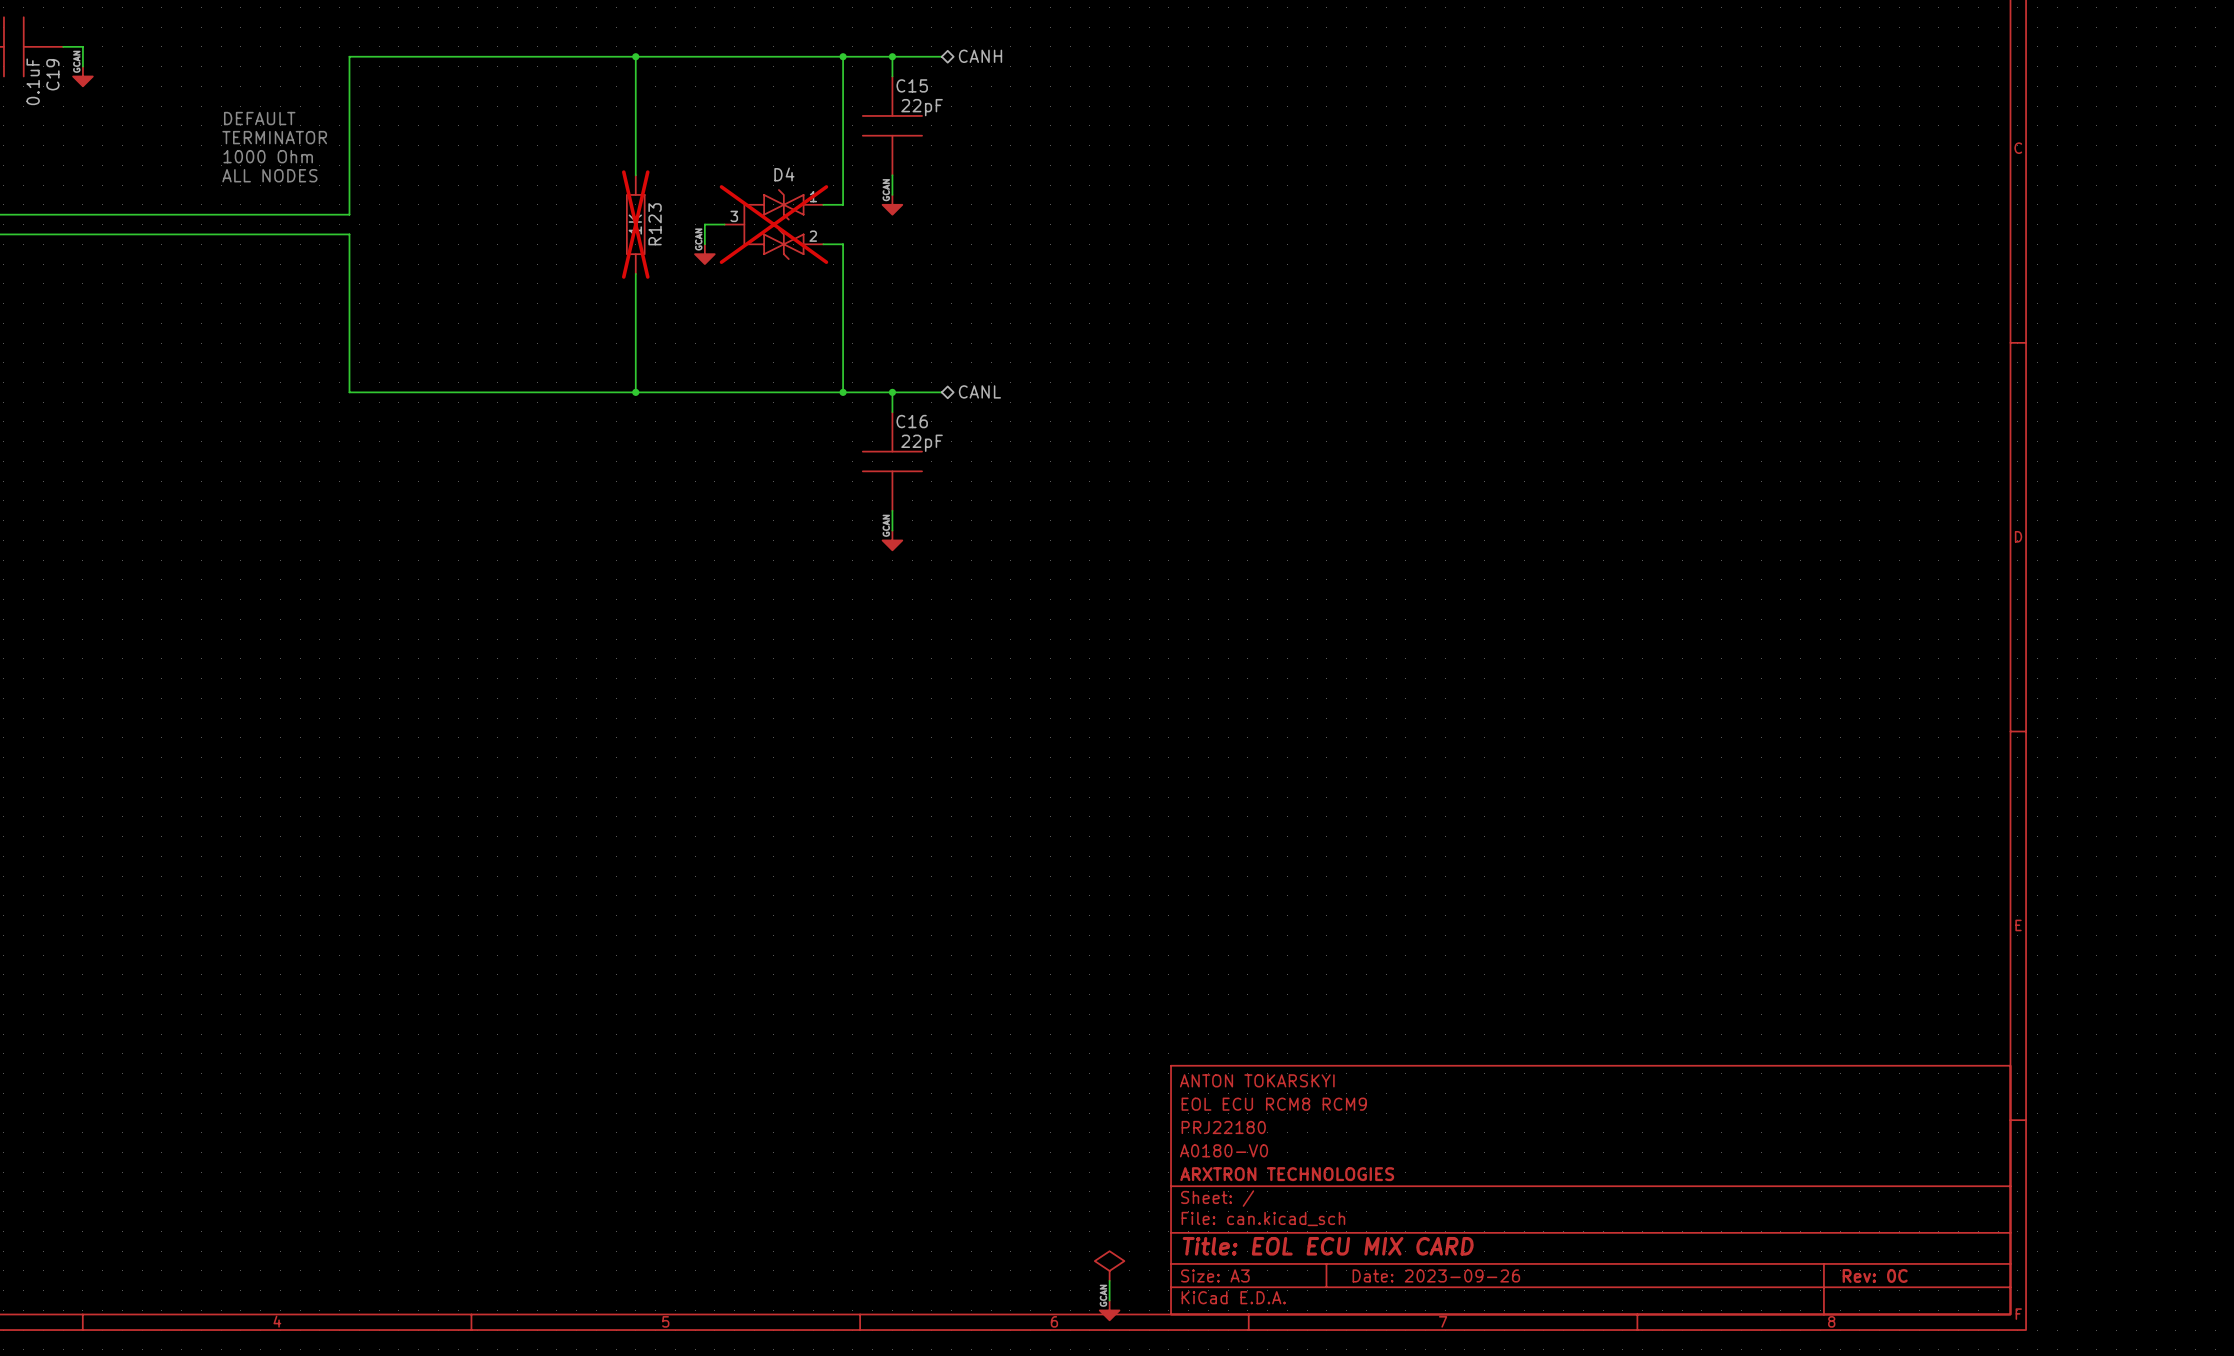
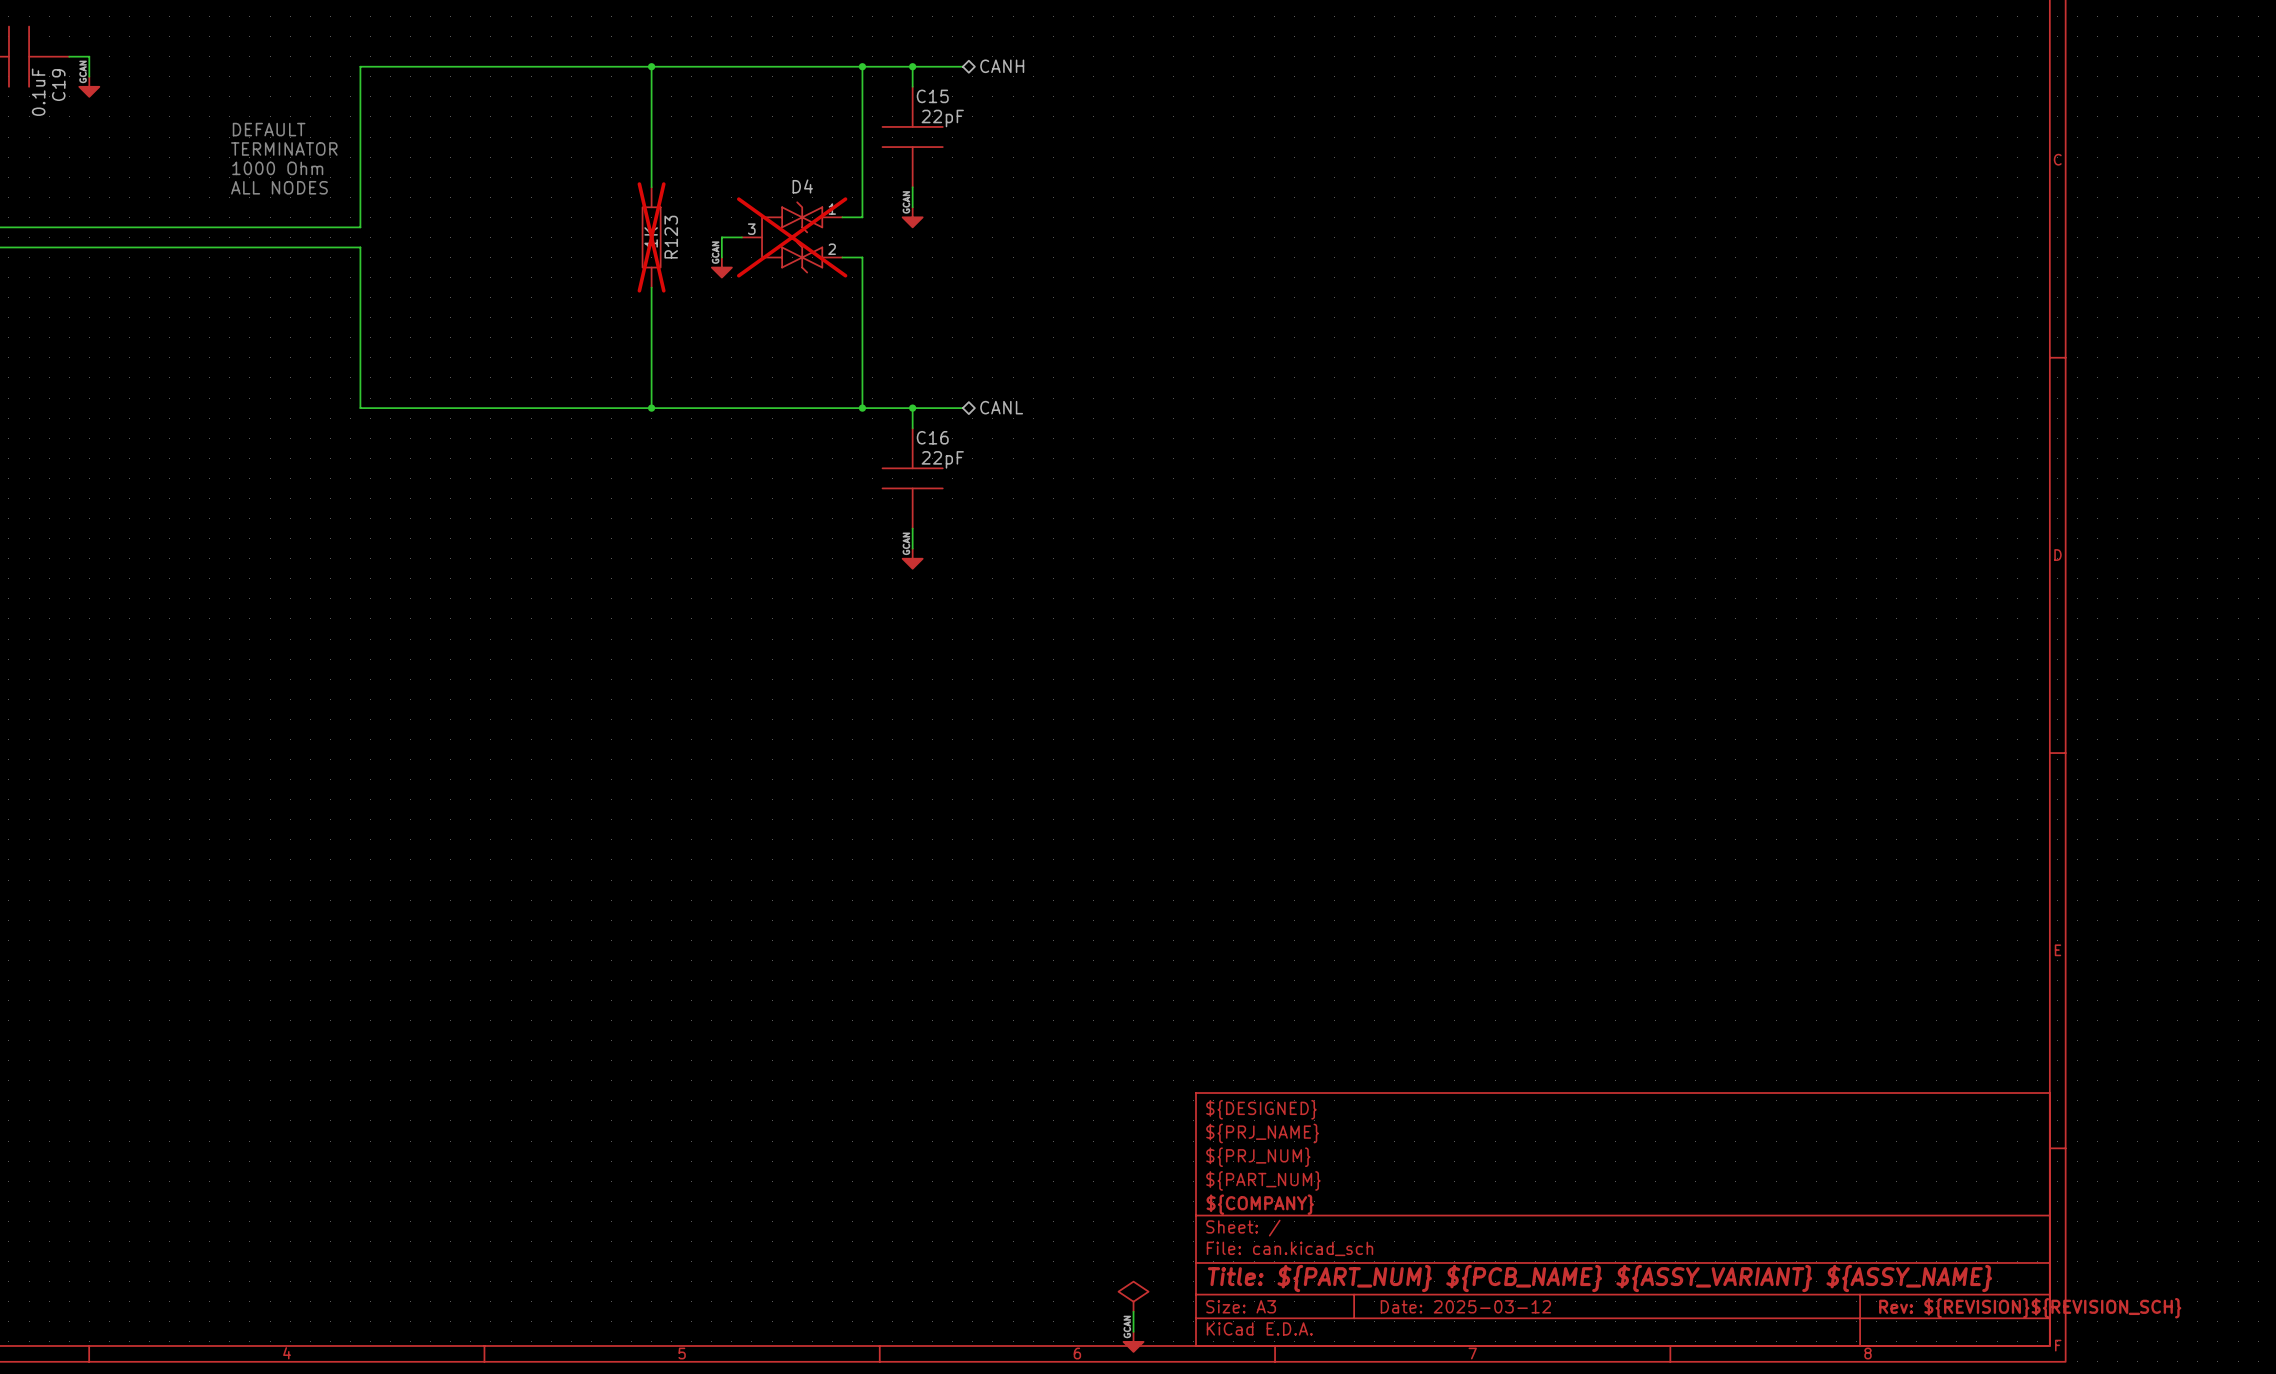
title block: ANTON TOKARSKYI (1257, 1080) -> ${DESIGNED} (1261, 1109)
title block: EOL ECU RCM8 RCM9 (1274, 1104) -> ${PRJ_NAME} (1262, 1133)
title block: PRJ22180 (1223, 1127) -> ${PRJ_NUM} (1258, 1157)
title block: A0180-V0 (1223, 1150) -> ${PART_NUM} (1263, 1180)
title block: ARXTRON TECHNOLOGIES (1287, 1174) -> ${COMPANY} (1260, 1204)
title block: Title: EOL ECU MIX CARD (1328, 1246) -> Title: ${PART_NUM} ${PCB_NAME} ${ASSY_VARIANT} ${ASSY_NAME} (1600, 1278)
title block: Date: 2023-09-26 (1436, 1275) -> Date: 2025-03-12 (1465, 1306)
title block: Rev: 0C (1875, 1275) -> Rev: ${REVISION}${REVISION_SCH} (2030, 1308)

